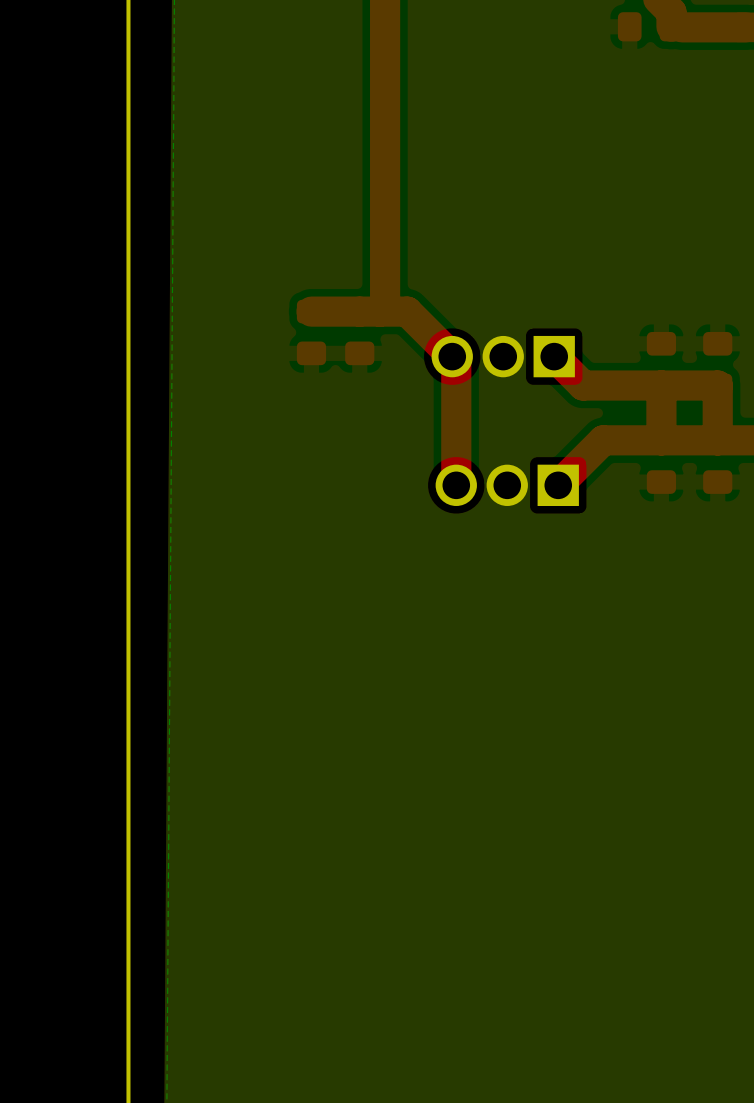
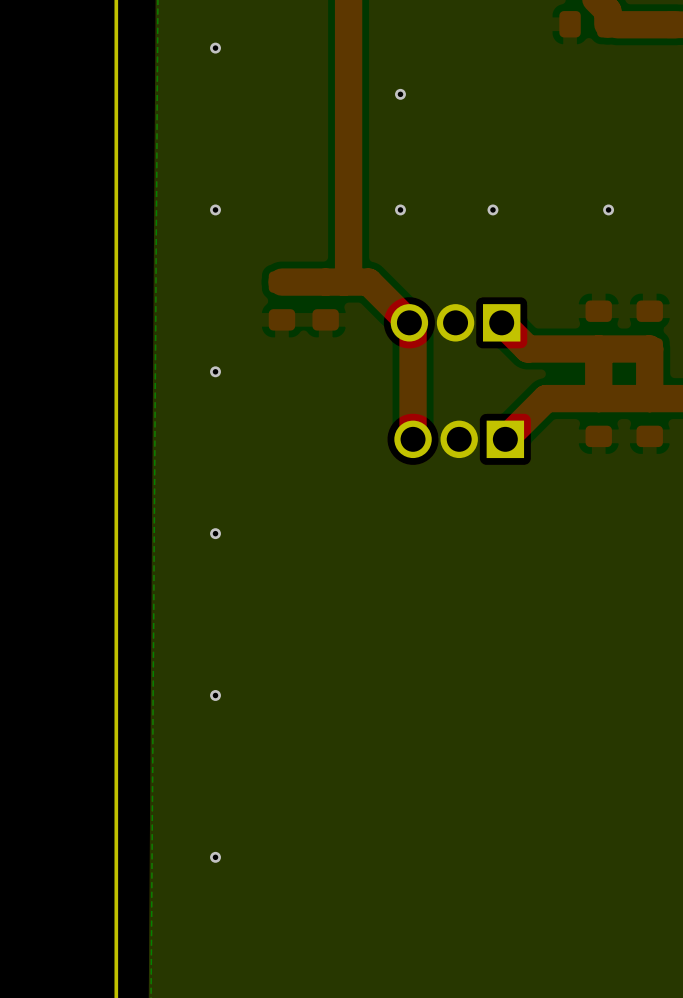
via: none -> (215, 48)
via: none -> (400, 94)
via: none -> (215, 209)
via: none -> (400, 209)
via: none -> (492, 209)
via: none -> (608, 209)
via: none -> (215, 371)
via: none -> (215, 533)
via: none -> (215, 695)
via: none -> (215, 857)

